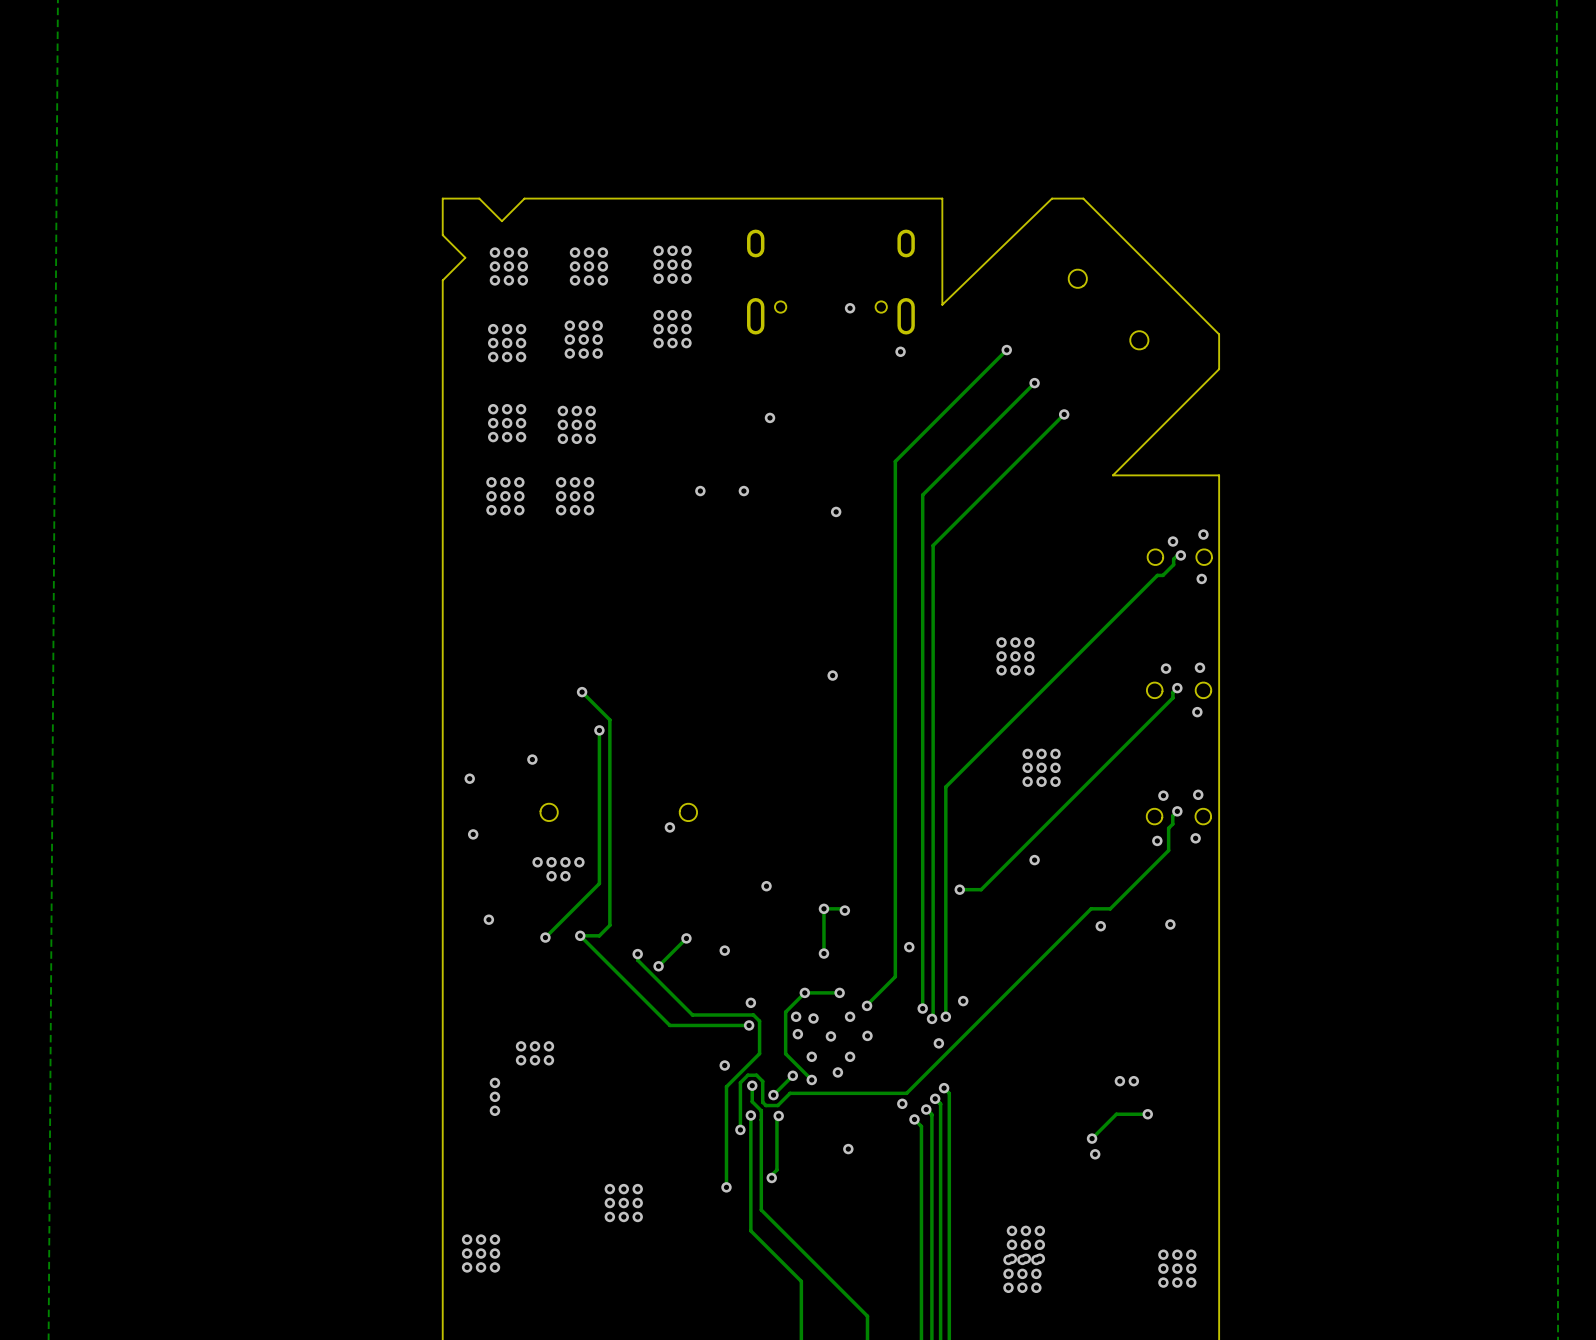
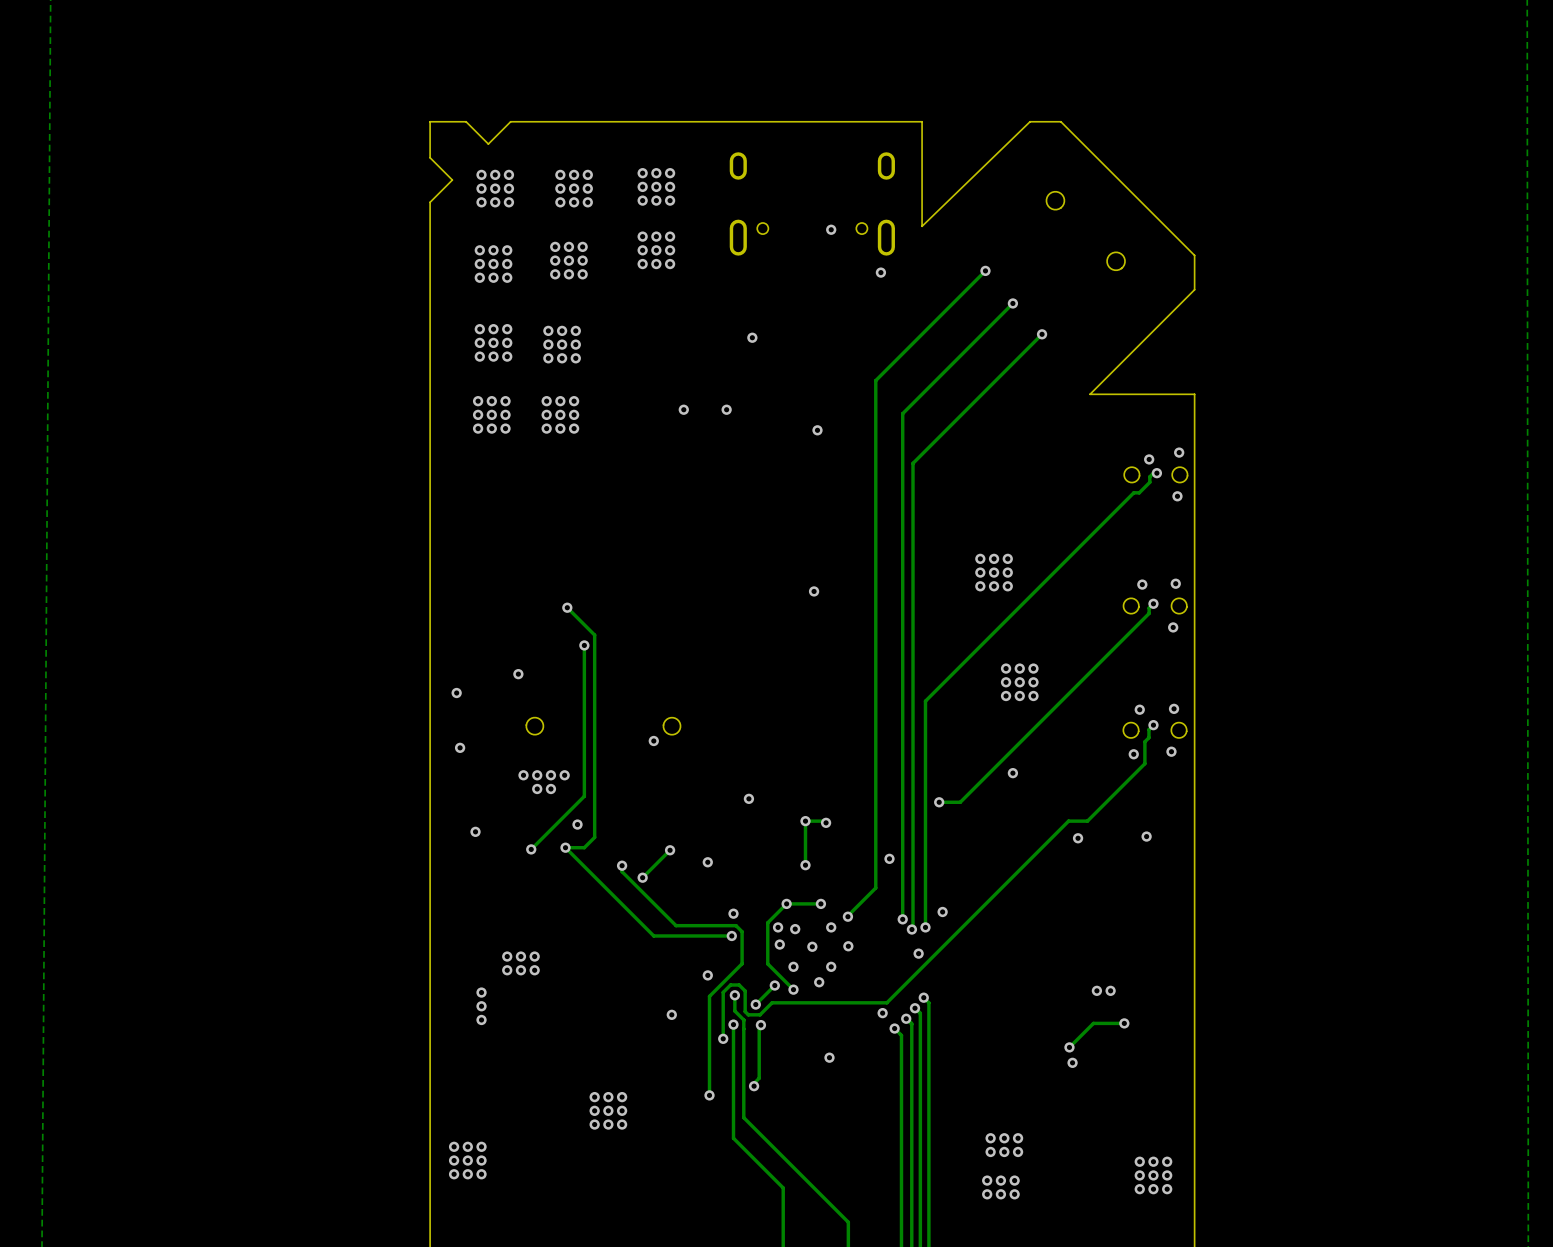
via: none -> (577, 824)
via: none -> (671, 1014)
via: (1011, 1258) -> none
via: (1025, 1258) -> none
via: (1039, 1258) -> none
via: (1008, 1259) -> none
via: (1022, 1259) -> none
via: (1036, 1259) -> none

